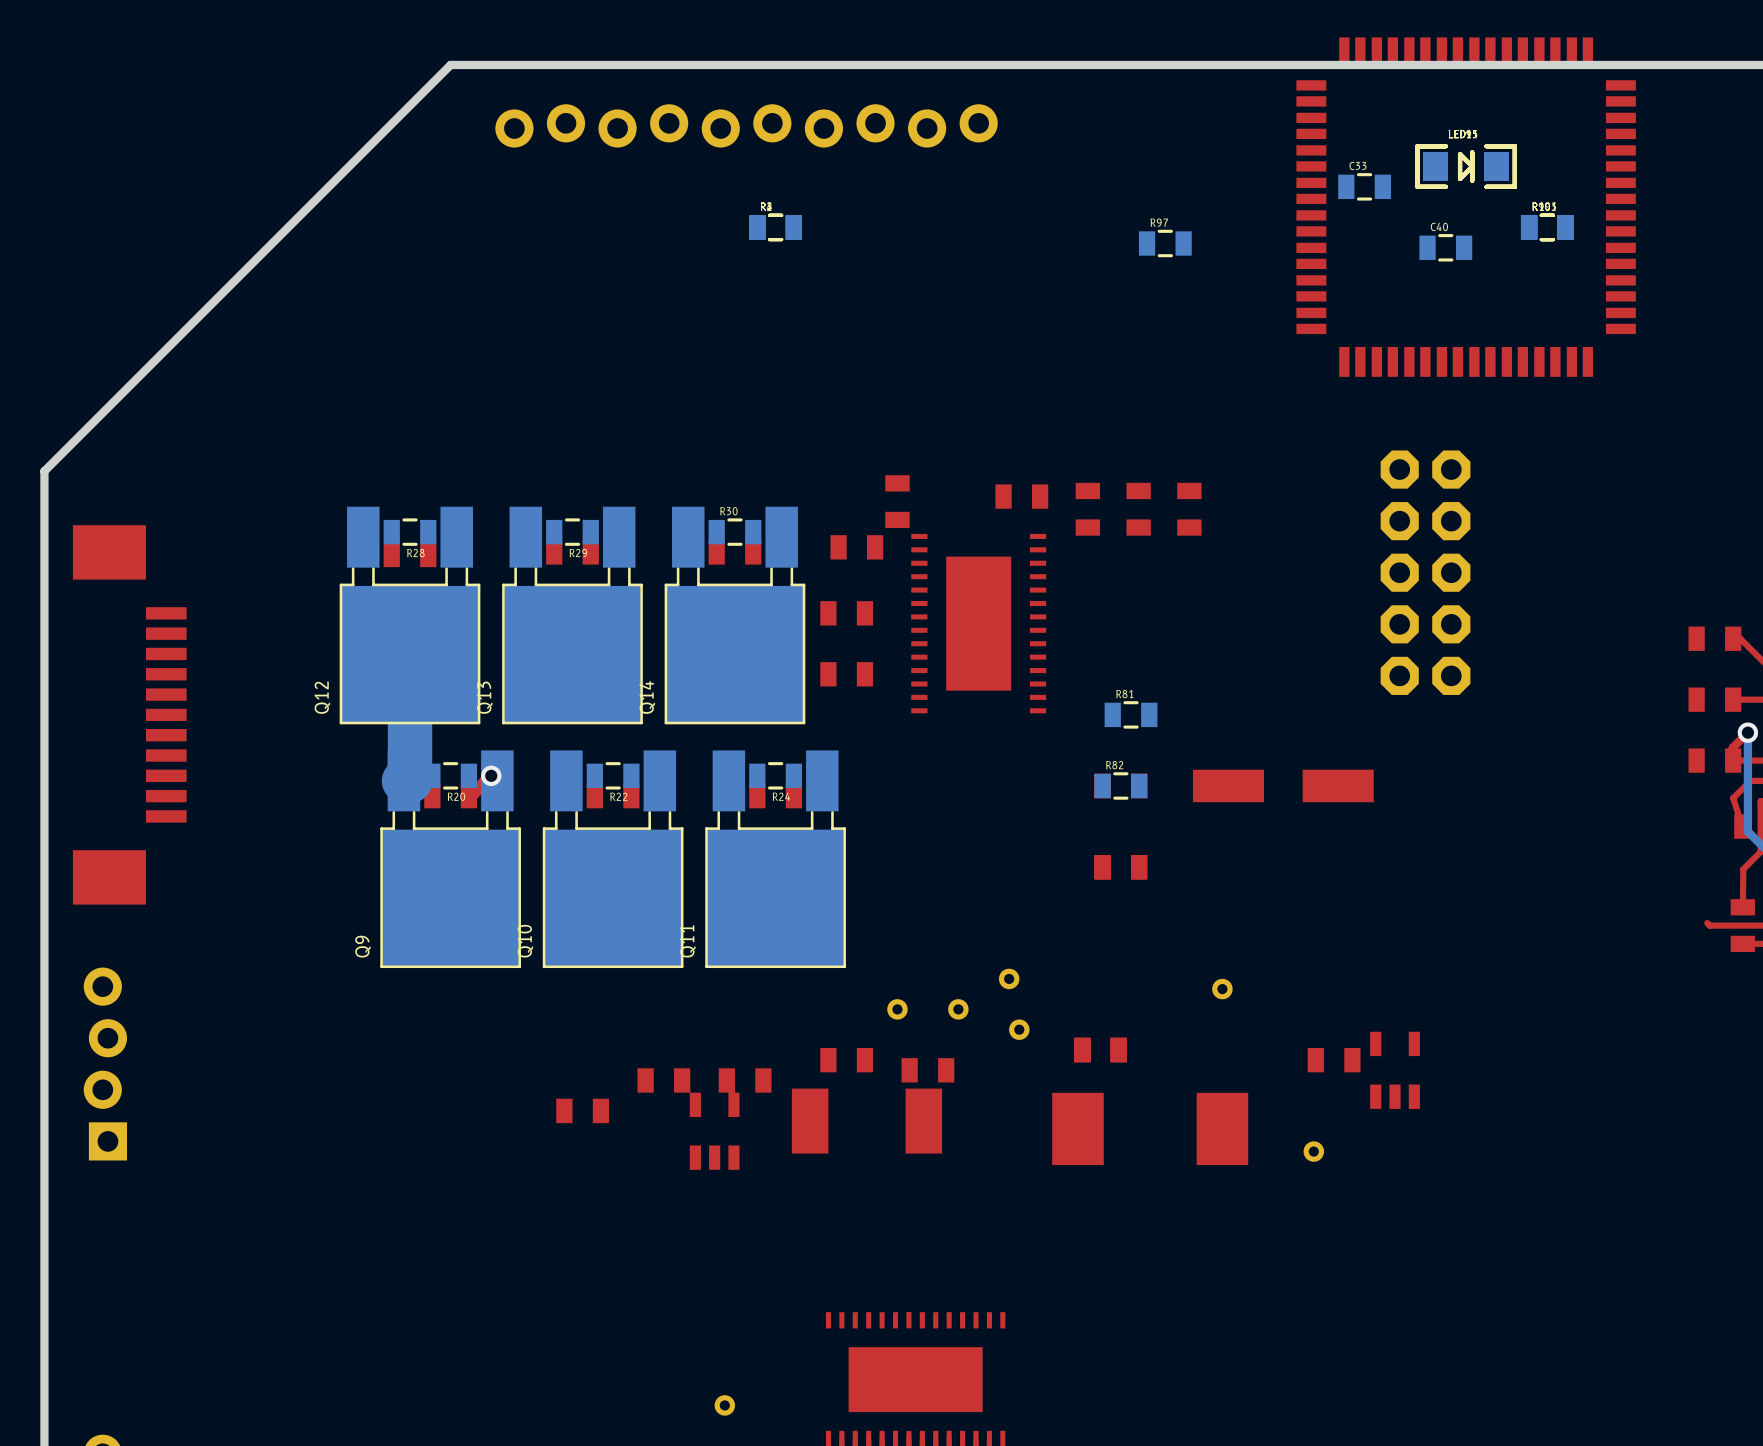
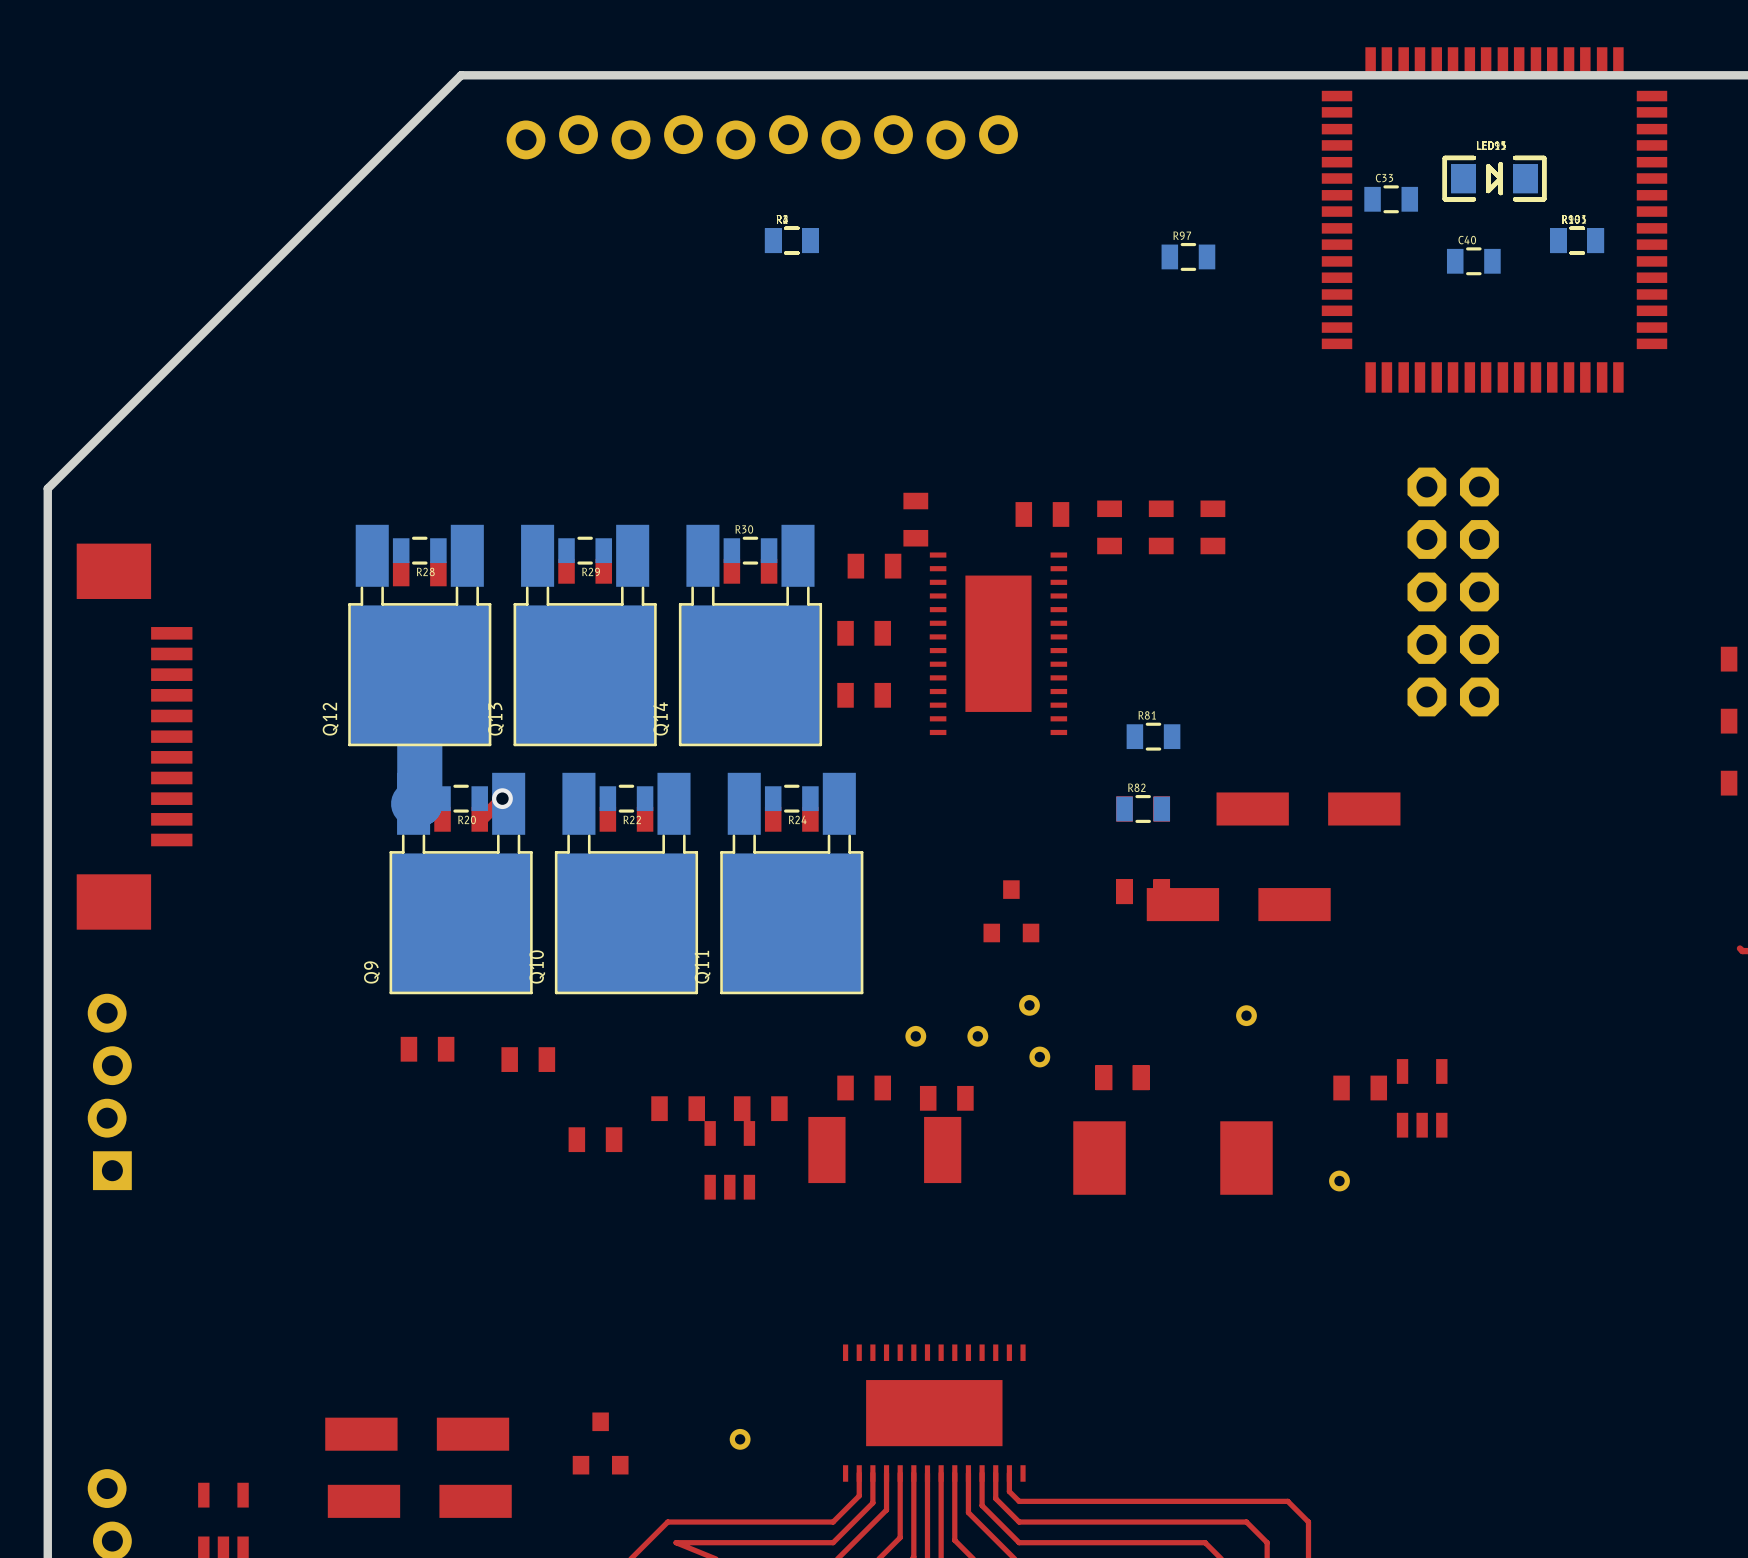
part: none -> (1238, 904)
part: none -> (1011, 911)
part: none -> (427, 1049)
part: none -> (528, 1059)
part: none -> (417, 1434)
part: none -> (600, 1443)

